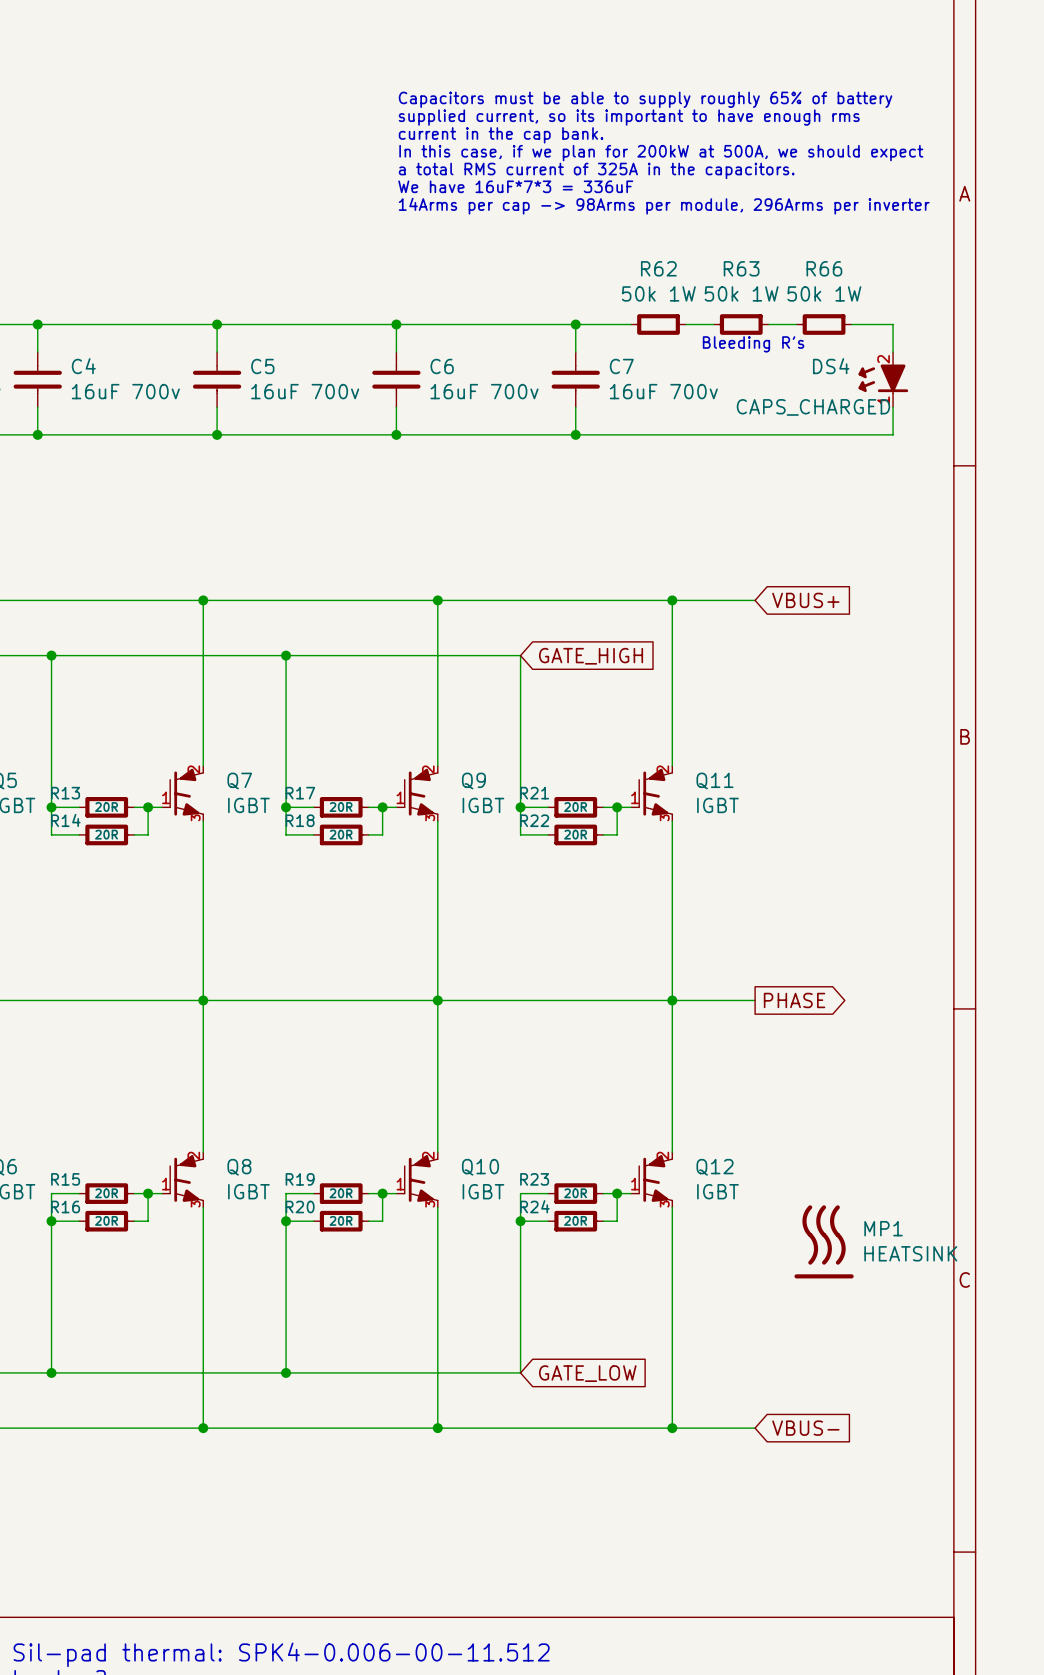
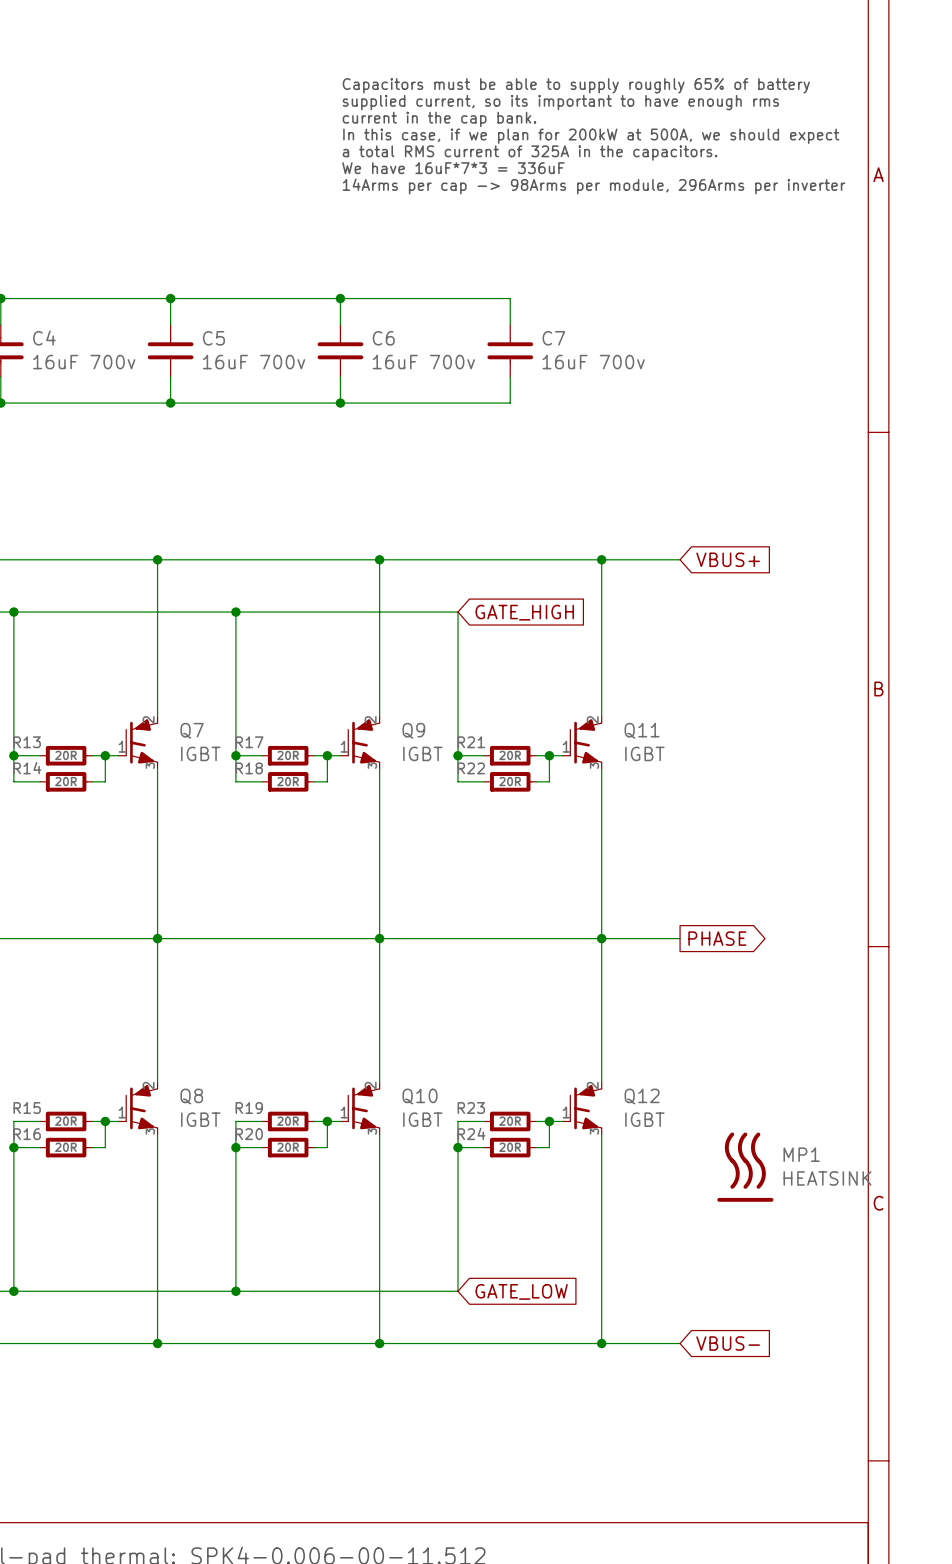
wire: (575, 324) (630, 324) -> none
junction: (575, 324) -> none
R62: 50k 1W (658, 324) -> none
wire: (686, 324) (713, 324) -> none
R63: 50k 1W (741, 324) -> none
wire: (768, 324) (796, 324) -> none
R66: 50k 1W (824, 324) -> none
wire: (851, 324) (893, 324) (893, 352) -> none
text: Bleeding R's (753, 344) -> none
DS4: CAPS_CHARGED (883, 379) -> none
wire: (893, 407) (893, 434) (575, 434) -> none
junction: (575, 434) -> none

